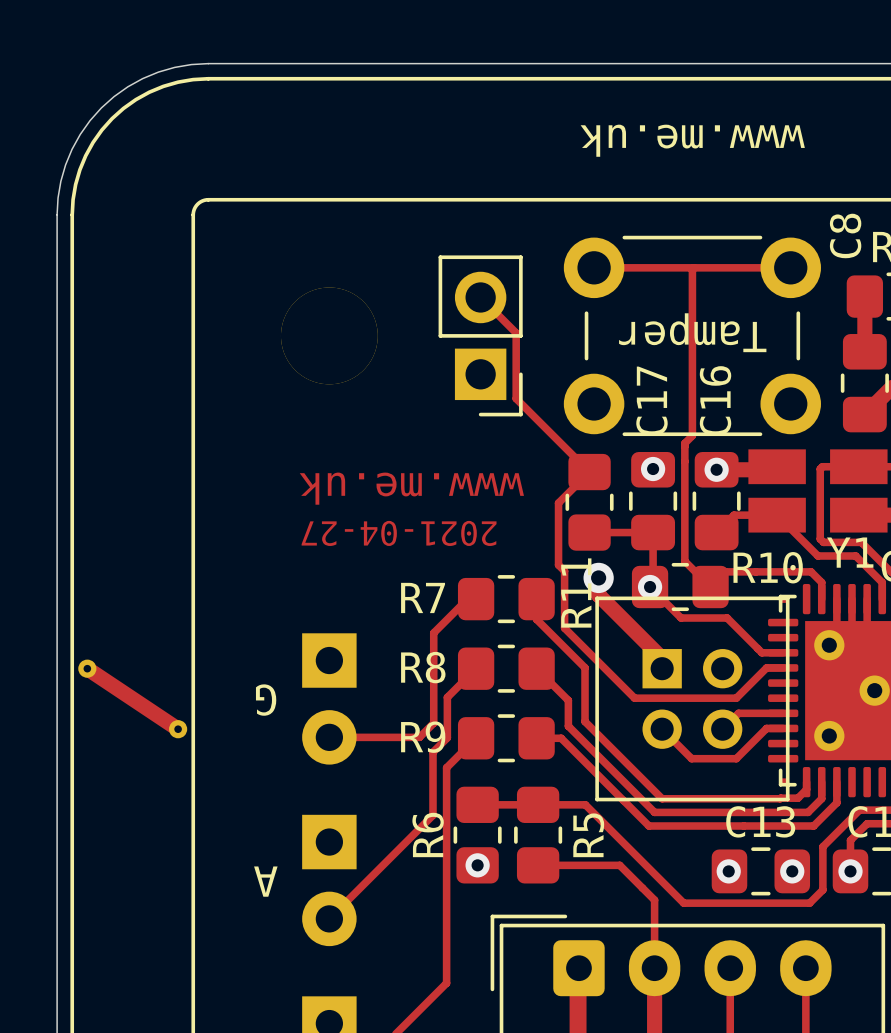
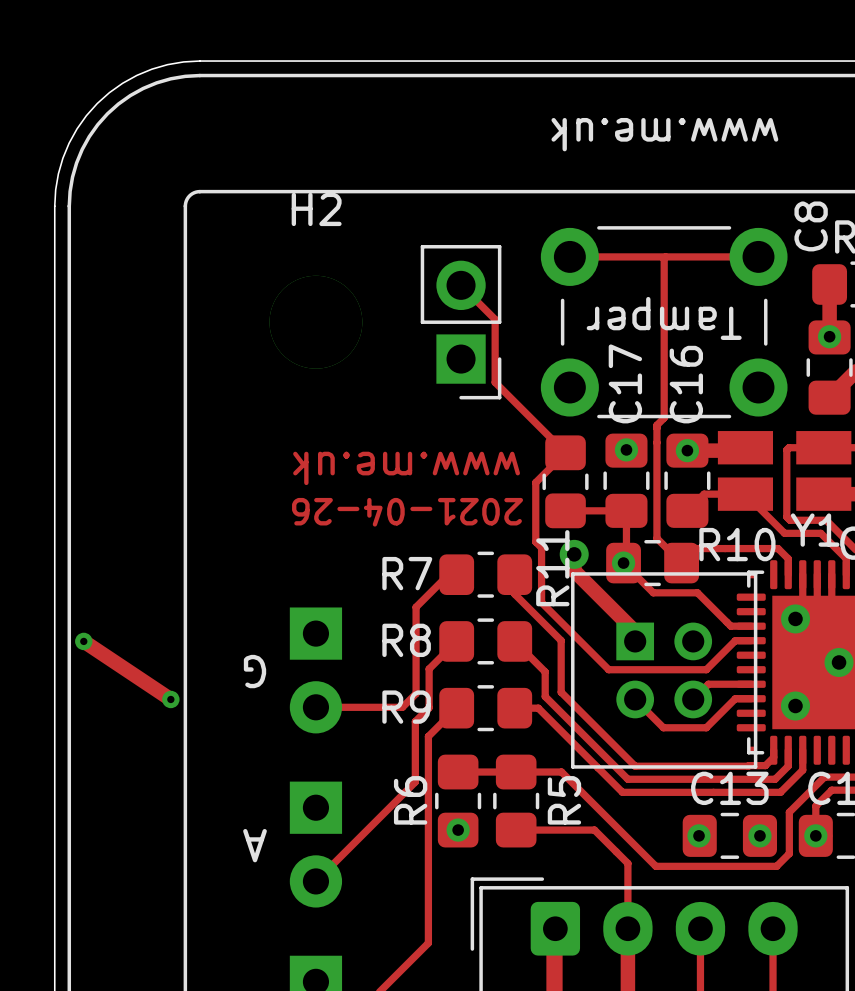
H2 name: none -> H2 (316, 209)
via: none -> (829, 336)
text: 2021-04-27 (399, 533) -> 2021-04-26 (407, 512)

